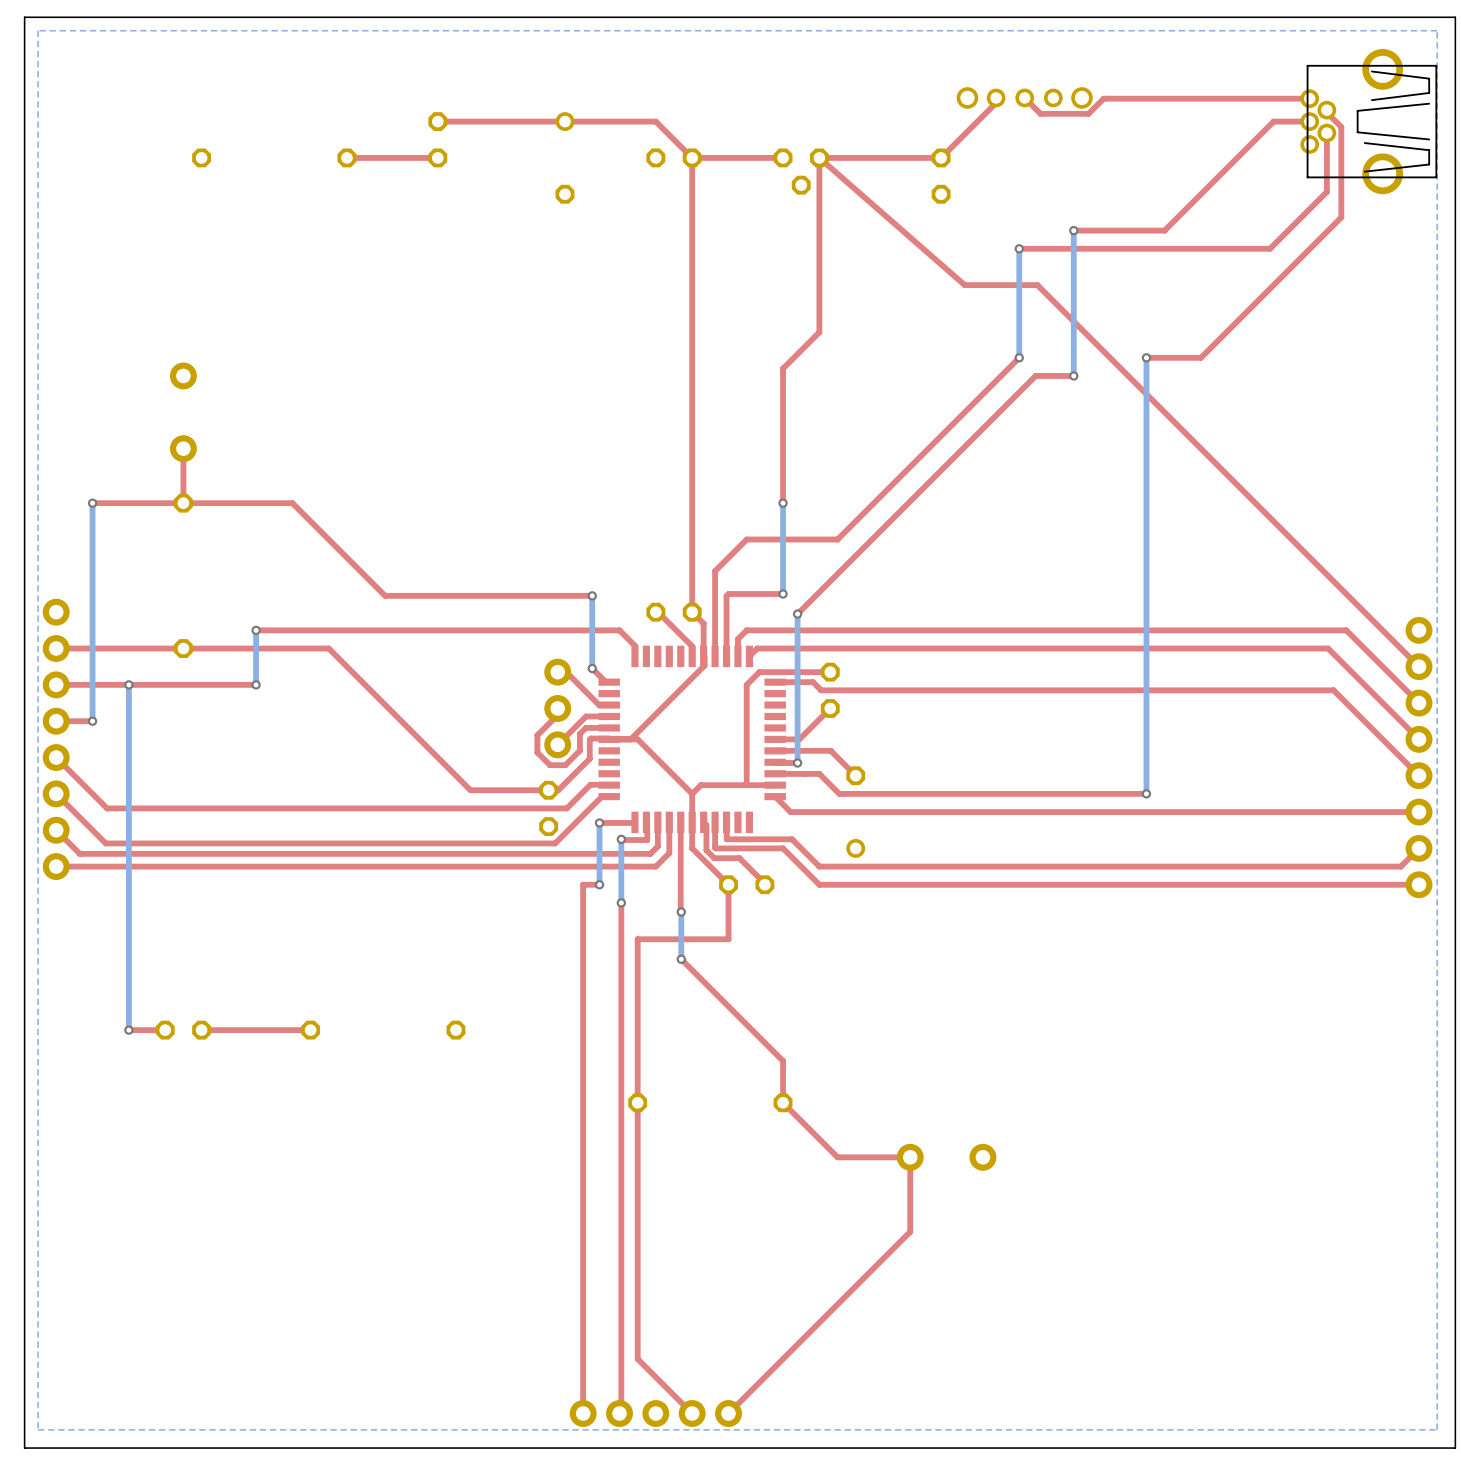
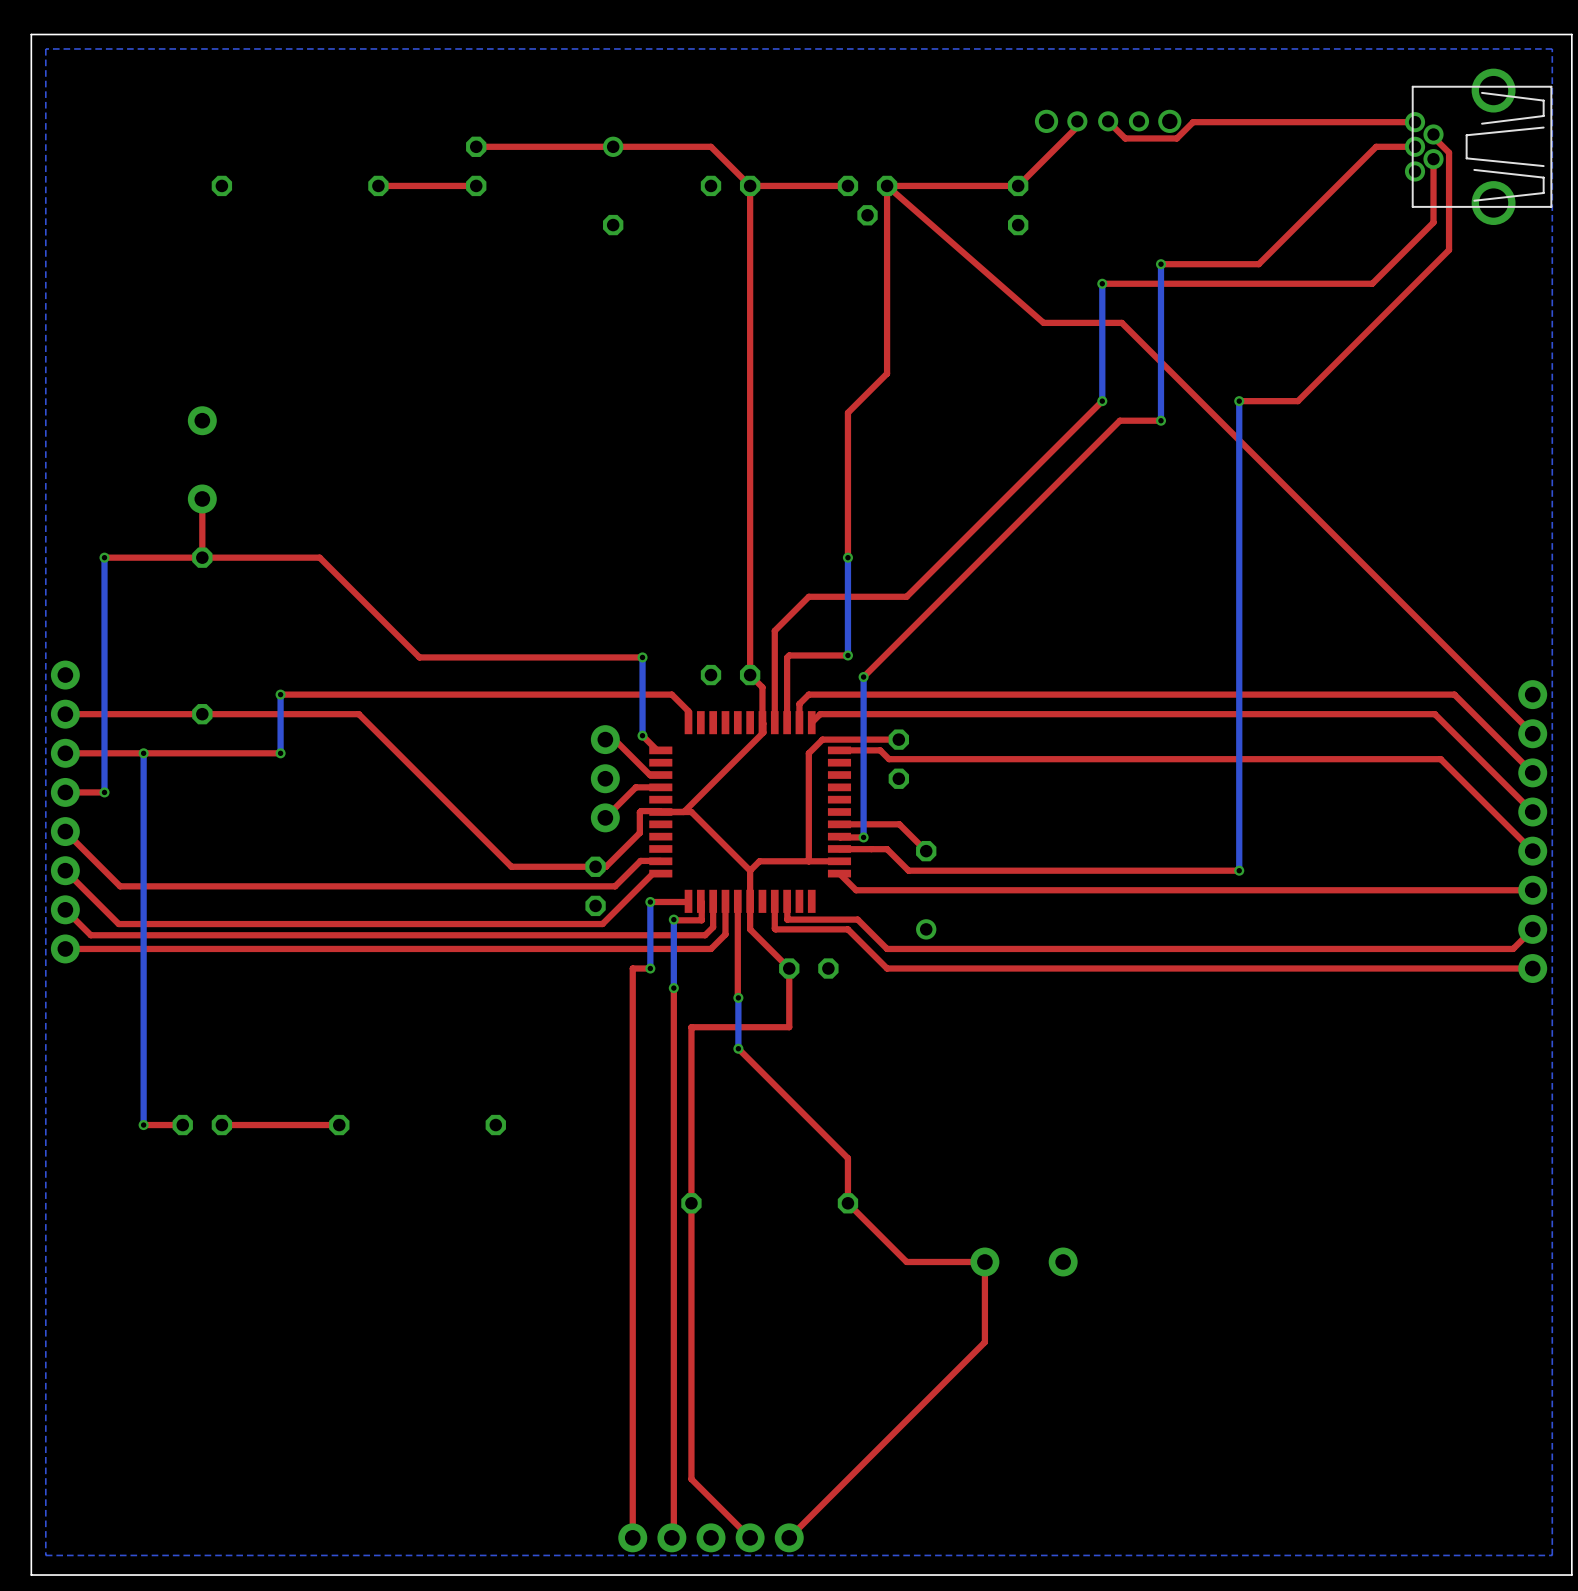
top track: (655, 612) (692, 646) (692, 656) -> none
top track: (557, 708) (557, 714) (537, 735) (537, 752) (550, 765) (565, 765) (579, 750) (579, 733) (585, 727) (609, 727) -> none
top track: (830, 708) (799, 739) (775, 739) -> none
top track: (703, 822) (706, 825) (706, 850) (714, 858) (739, 858) (764, 884) -> none

